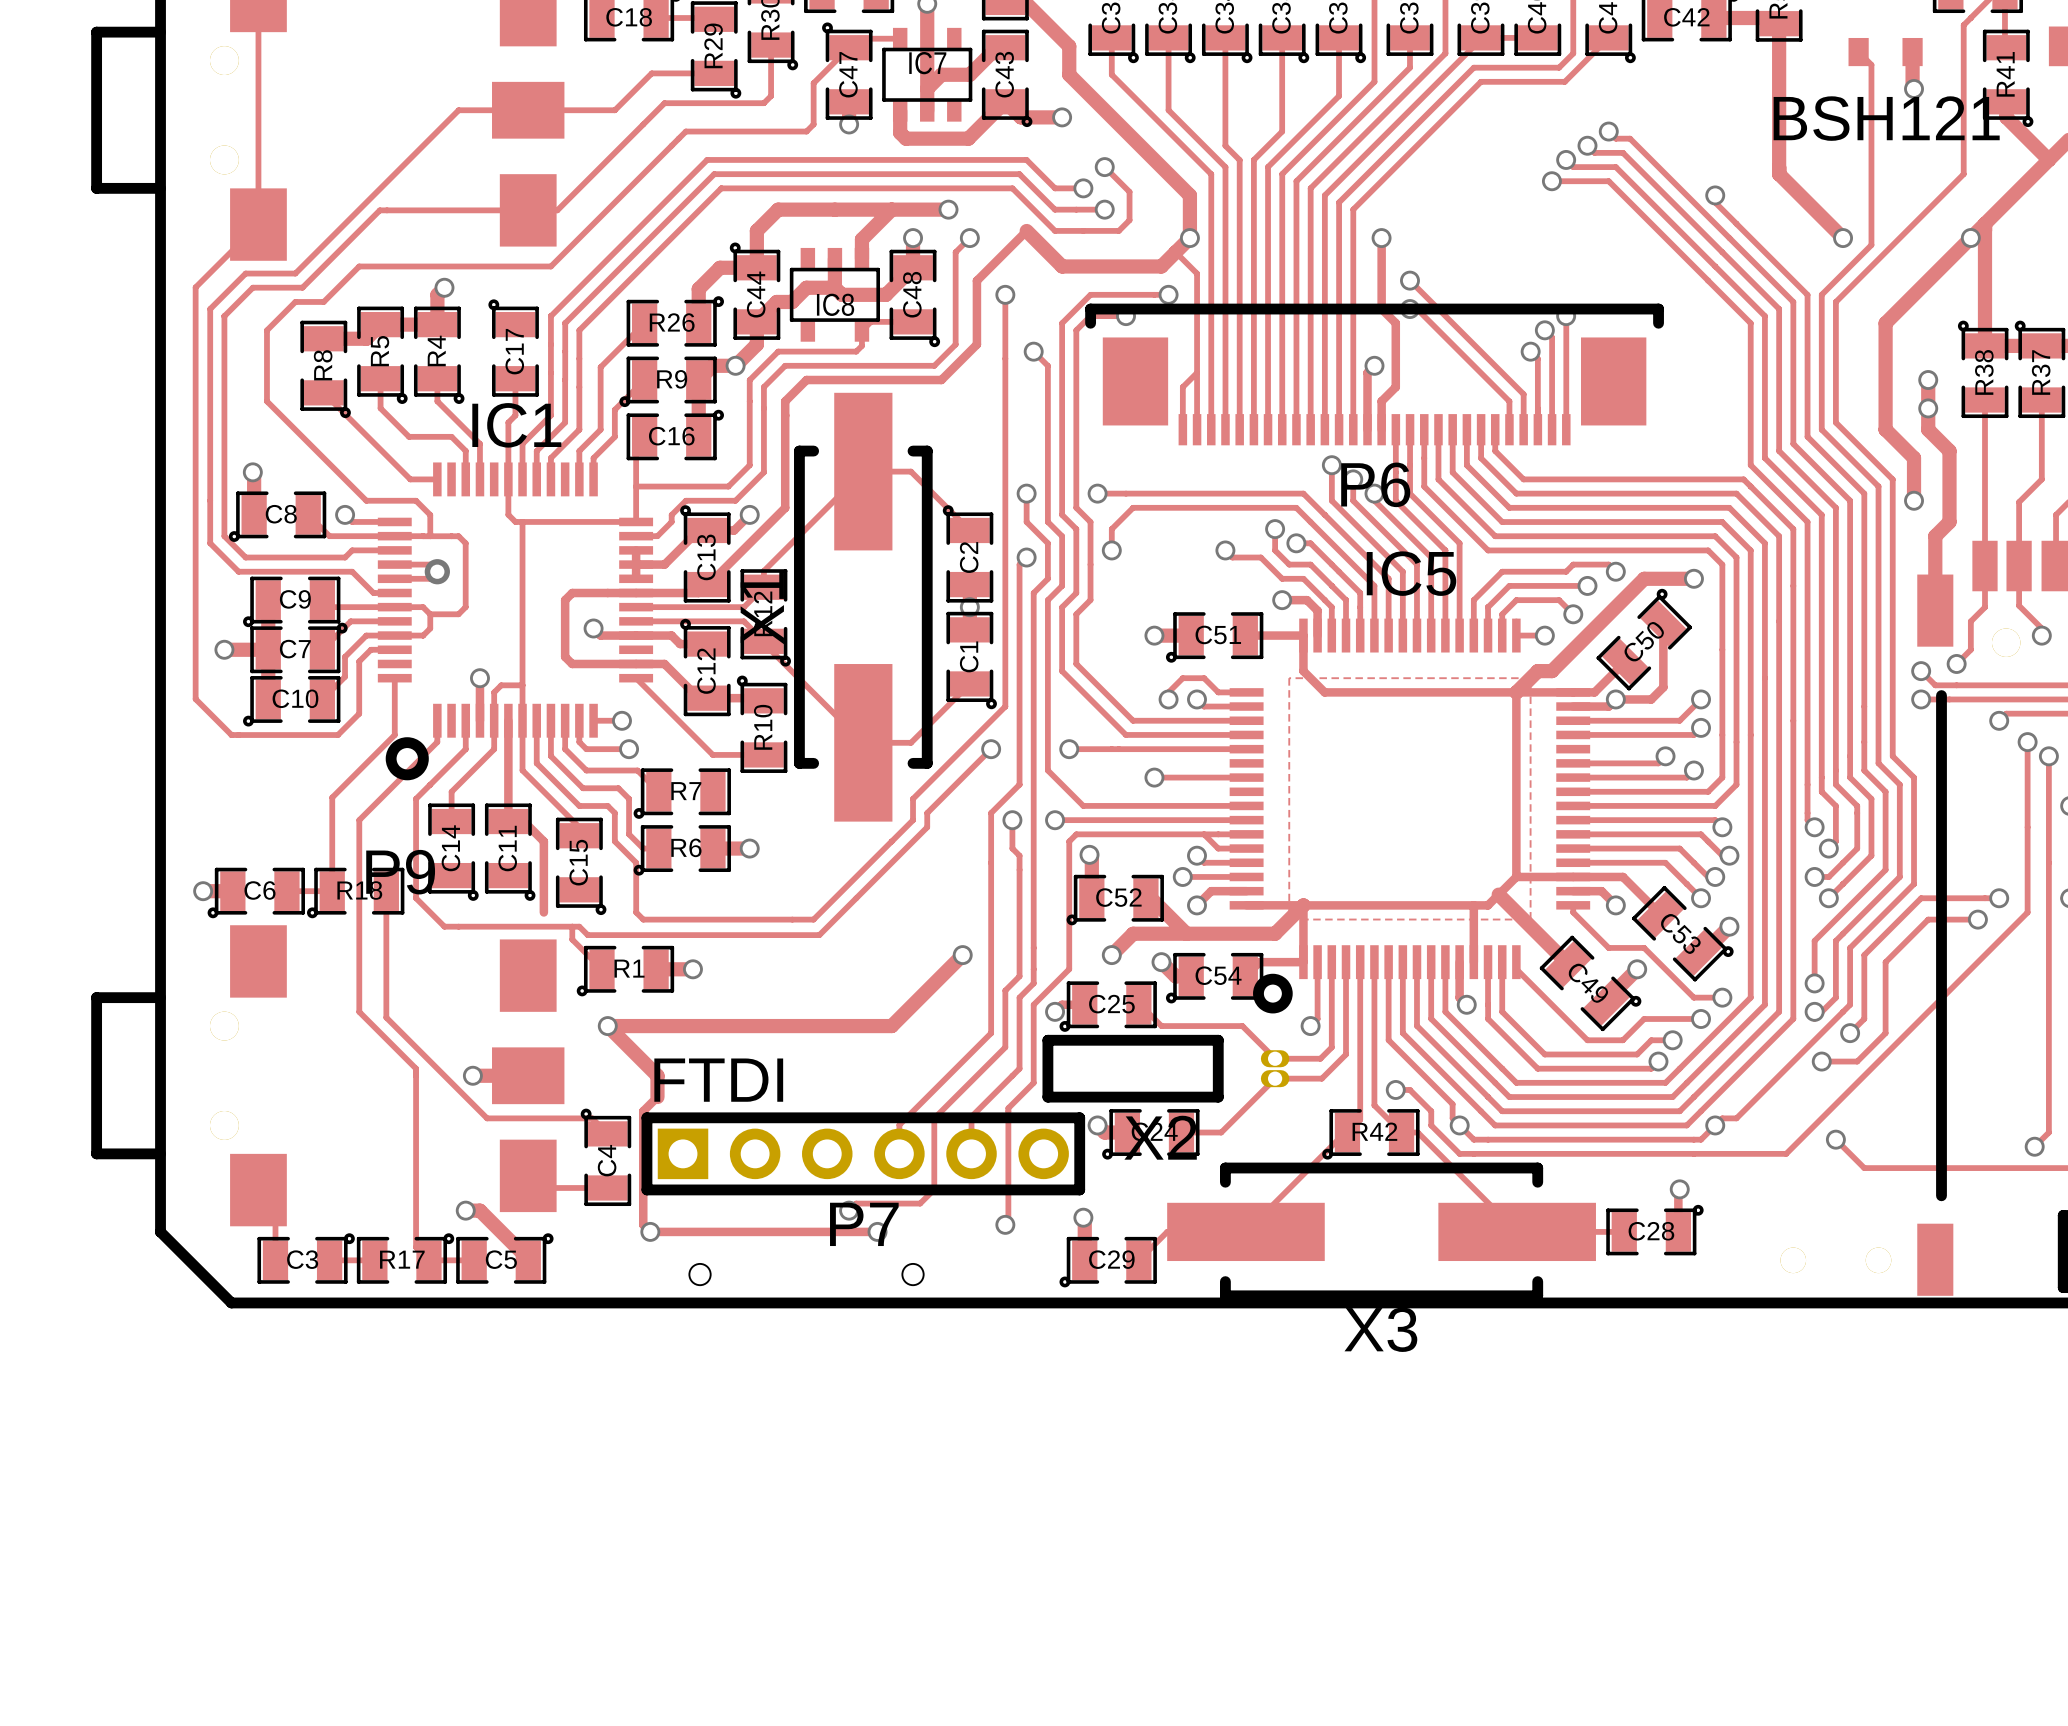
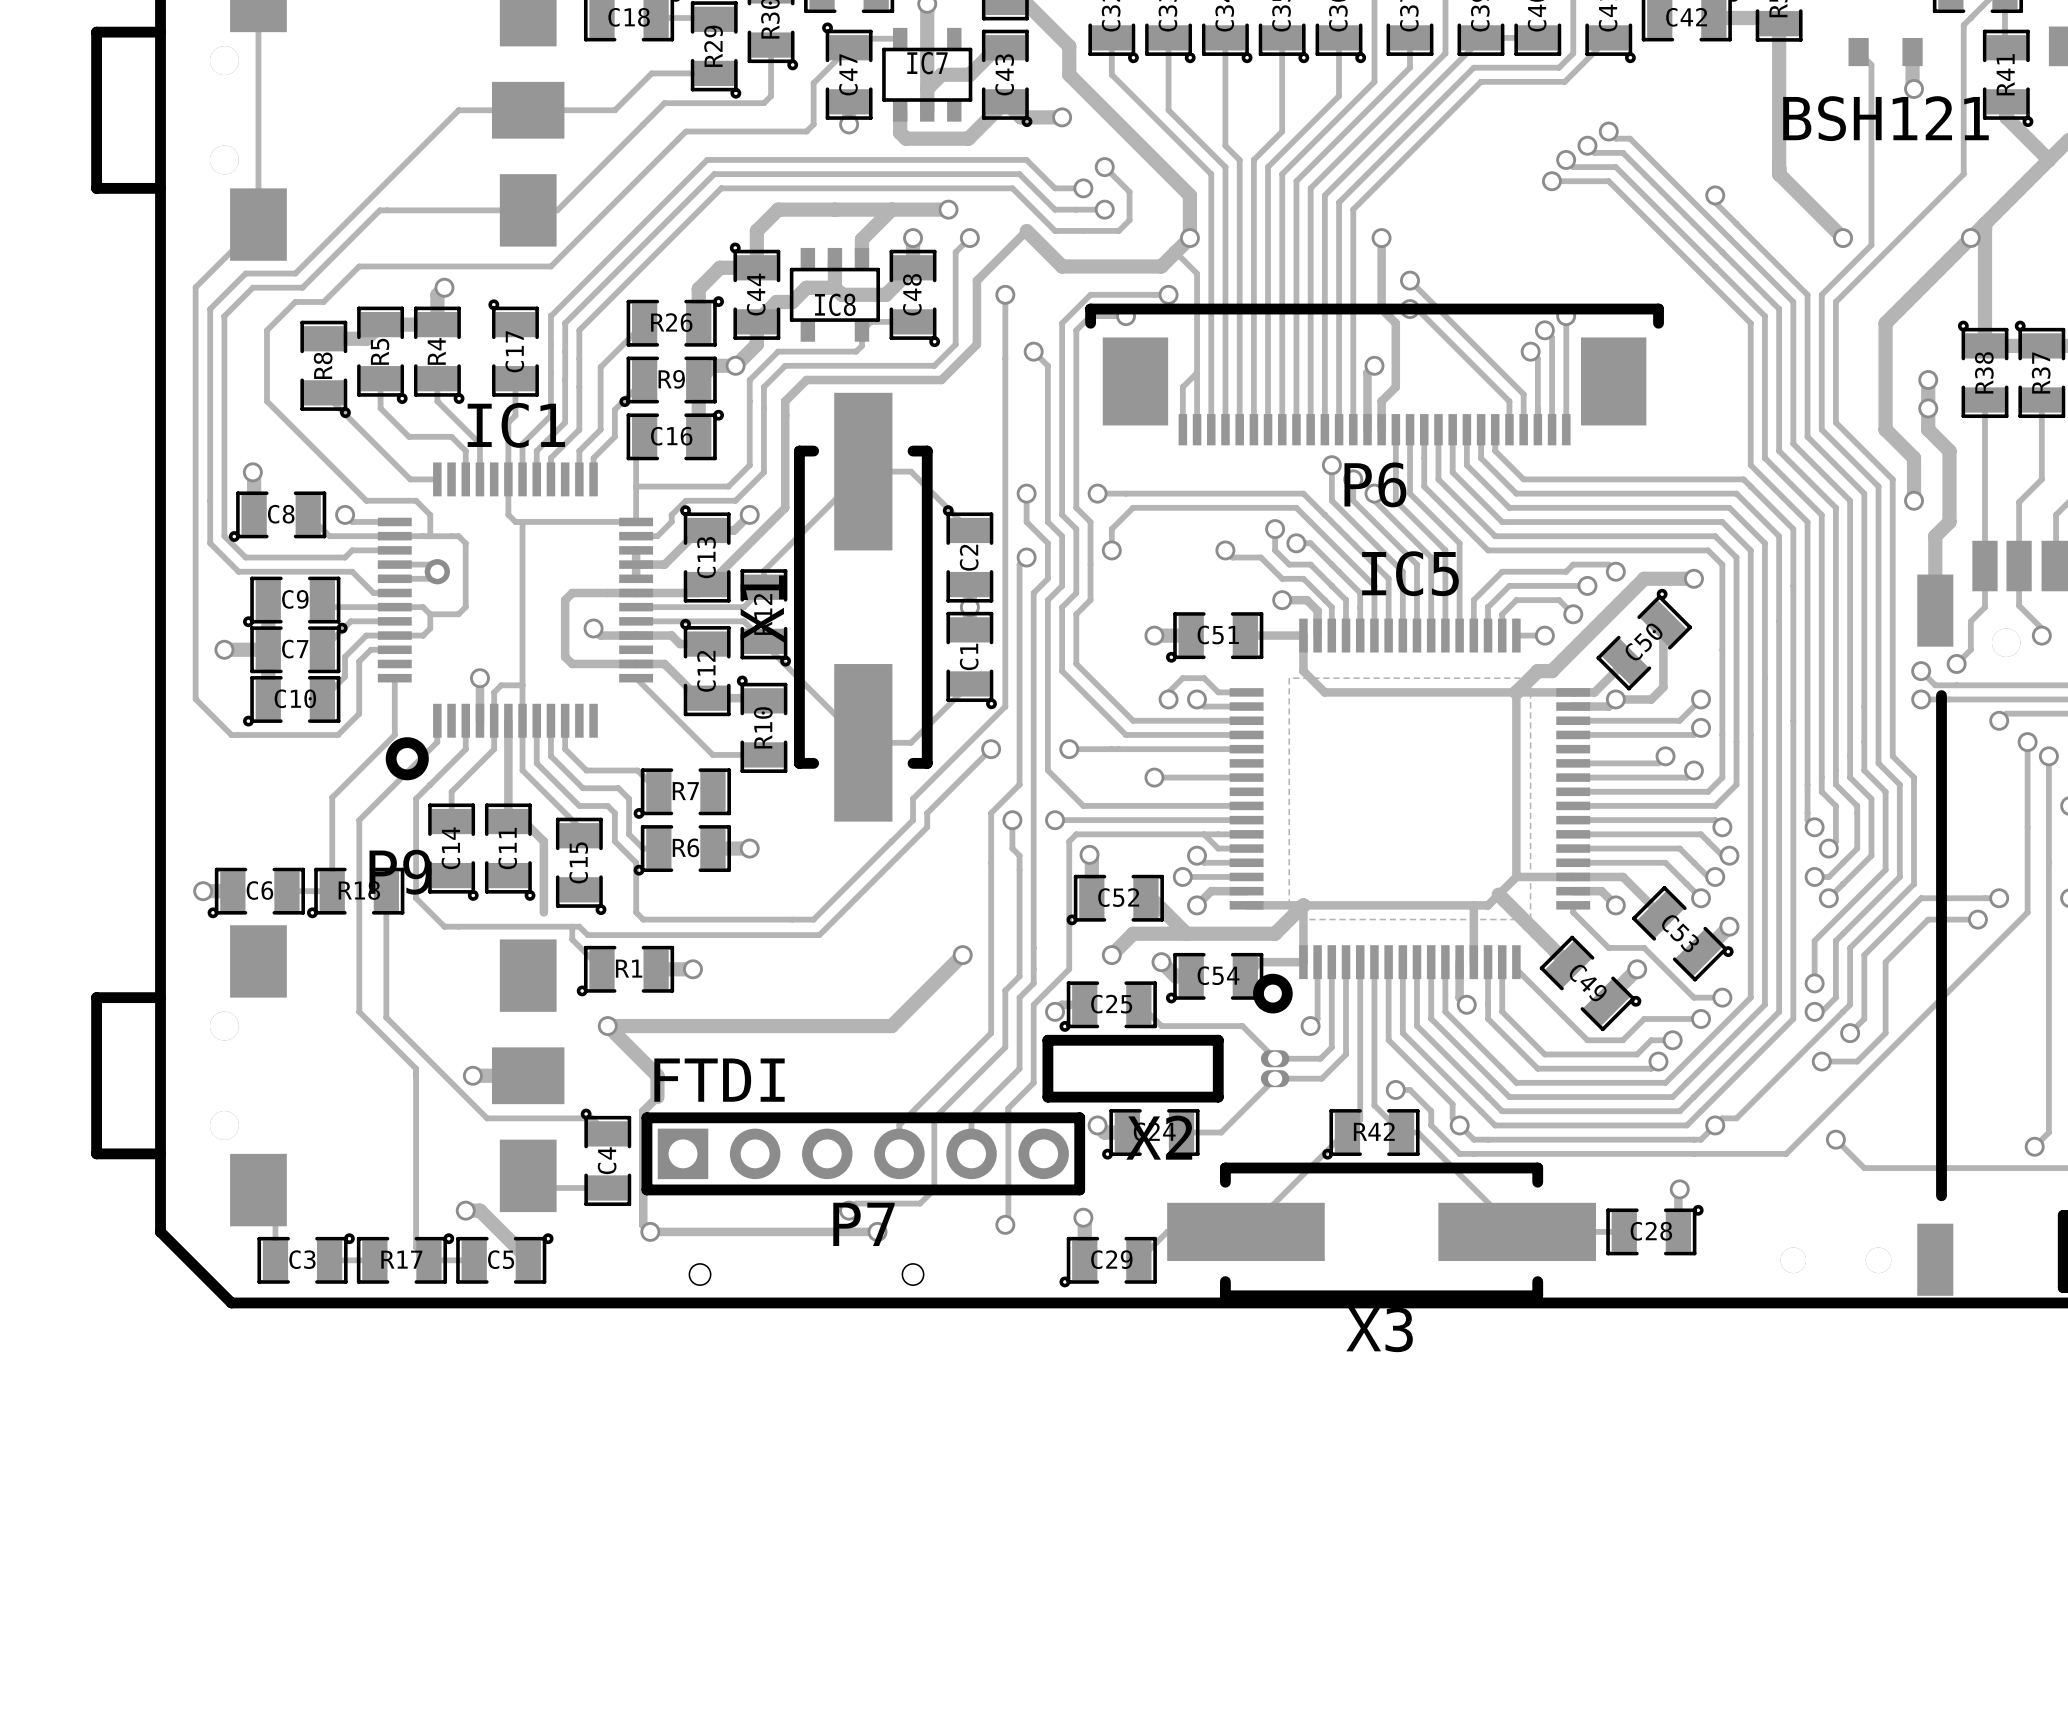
track: (579, 720) (579, 742) (586, 749) (629, 749) -> none
track: (593, 720) (621, 720) -> none
via: (621, 720) -> none
via: (629, 749) -> none

